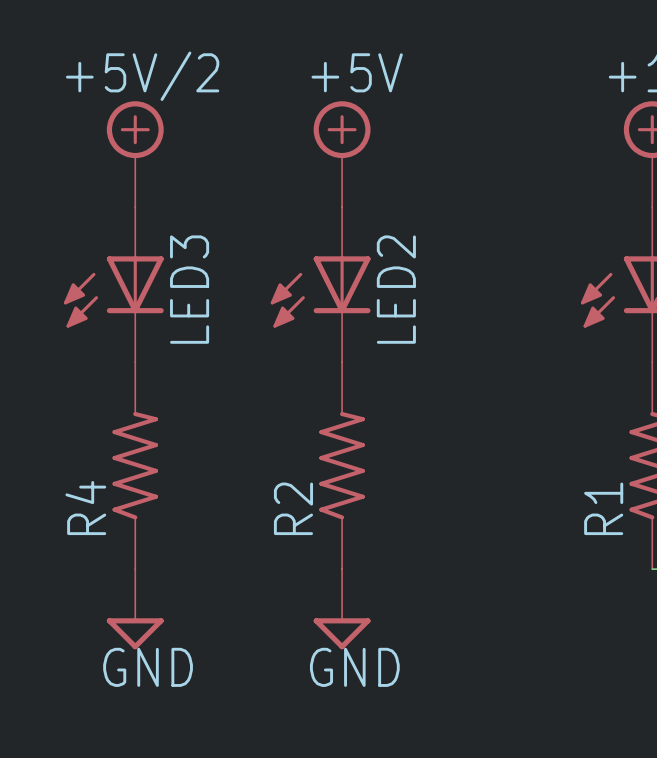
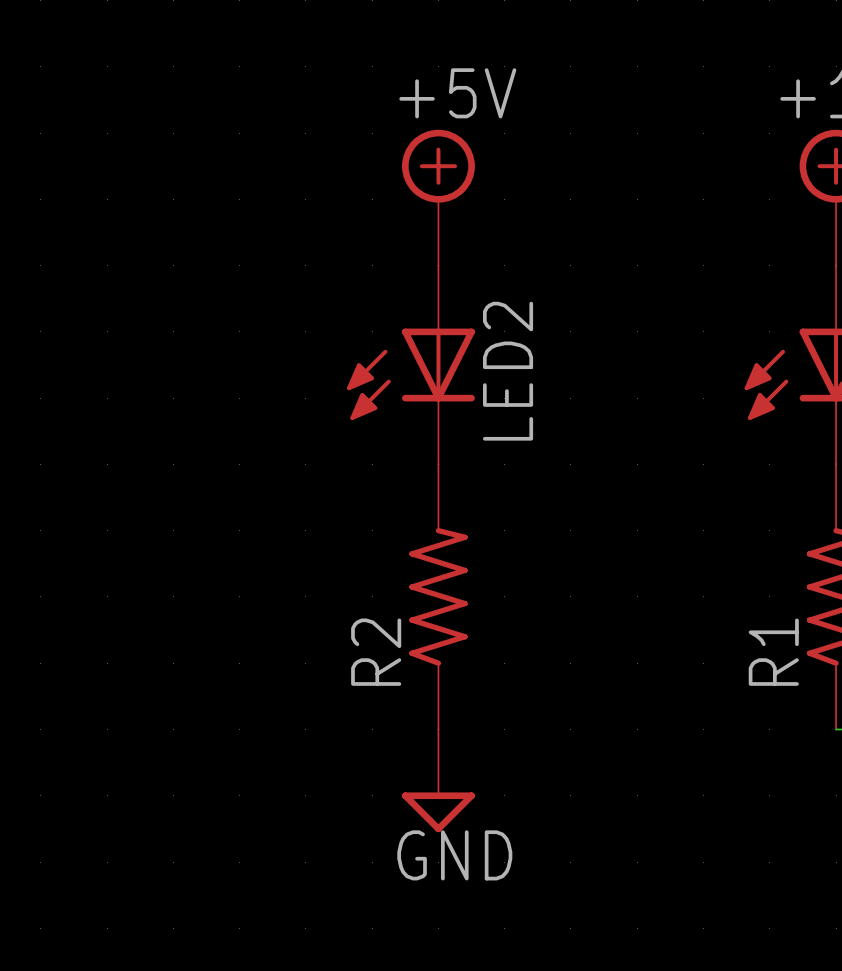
power symbol: +5V/2 (135, 154) -> none
LED3: (113, 284) -> none
R4: (135, 465) -> none
power symbol: GND (135, 609) -> none

